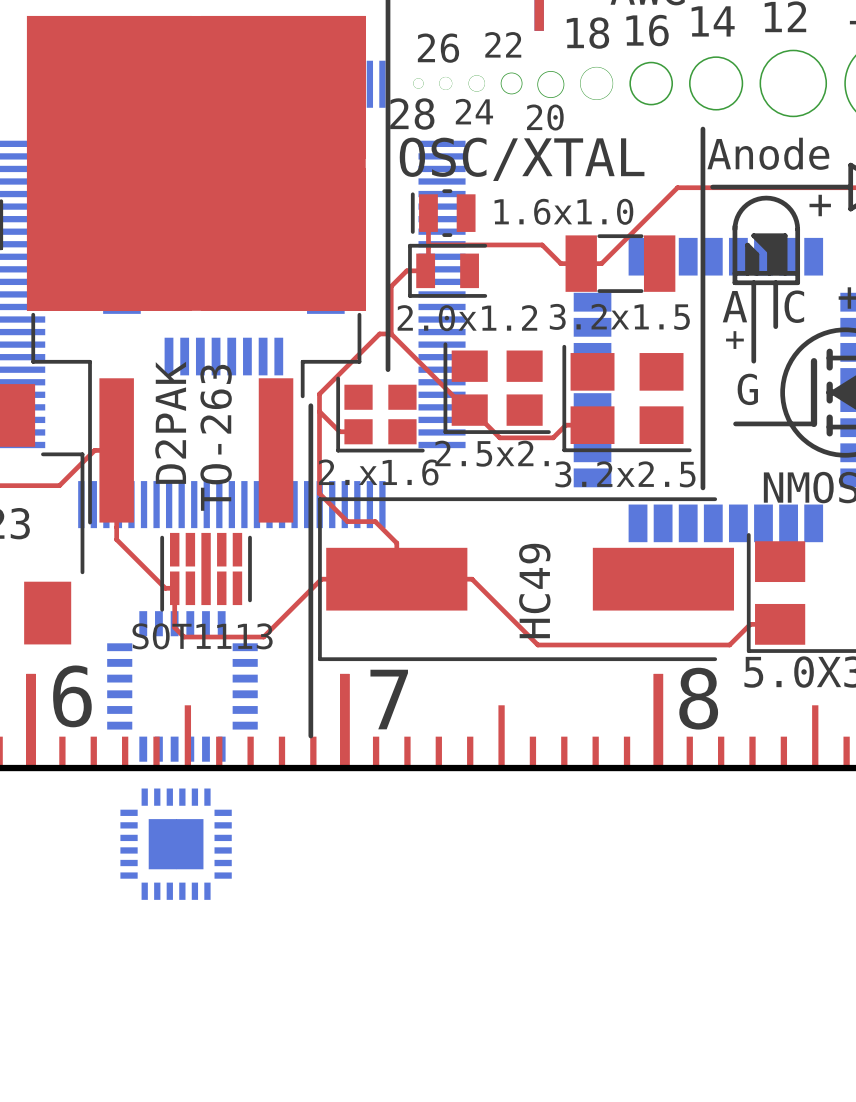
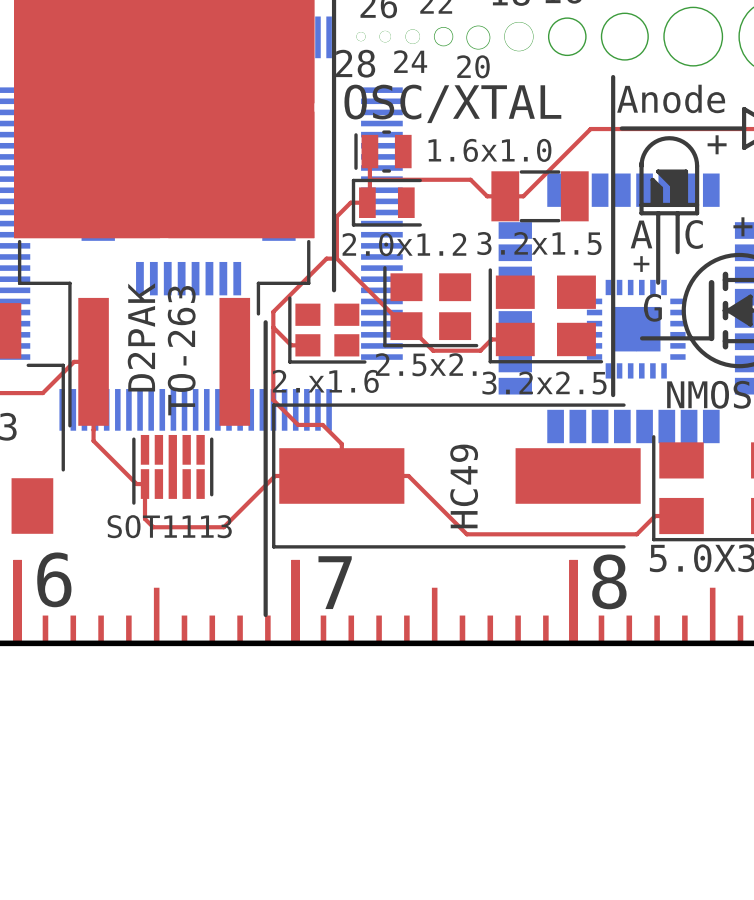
part: (182, 686) -> none
part position: (176, 844) -> (636, 329)

